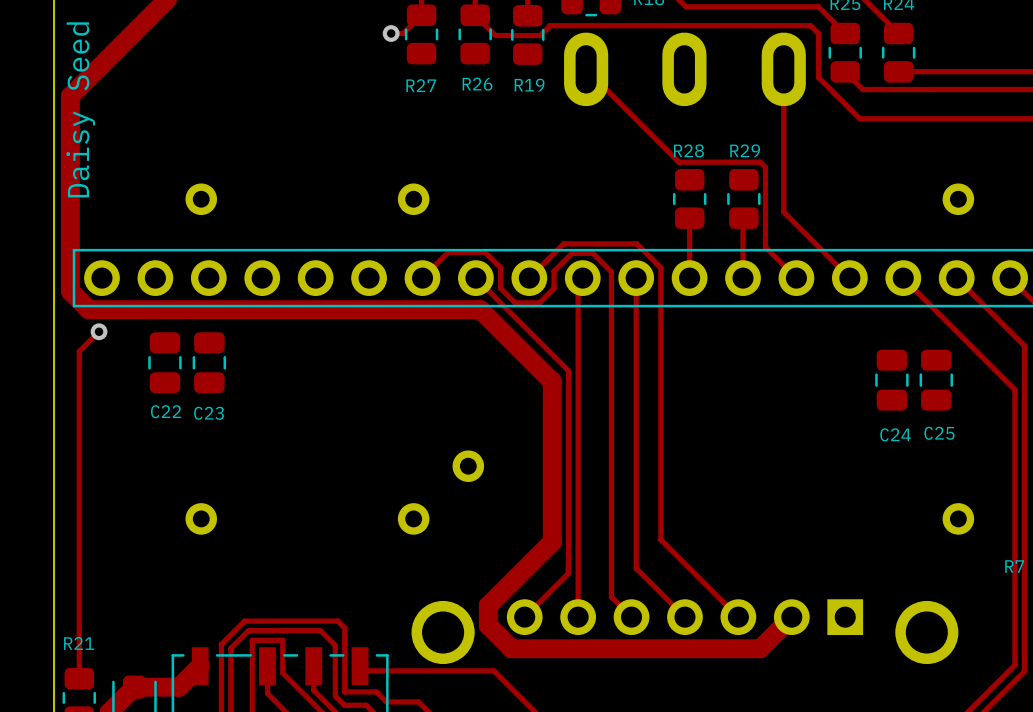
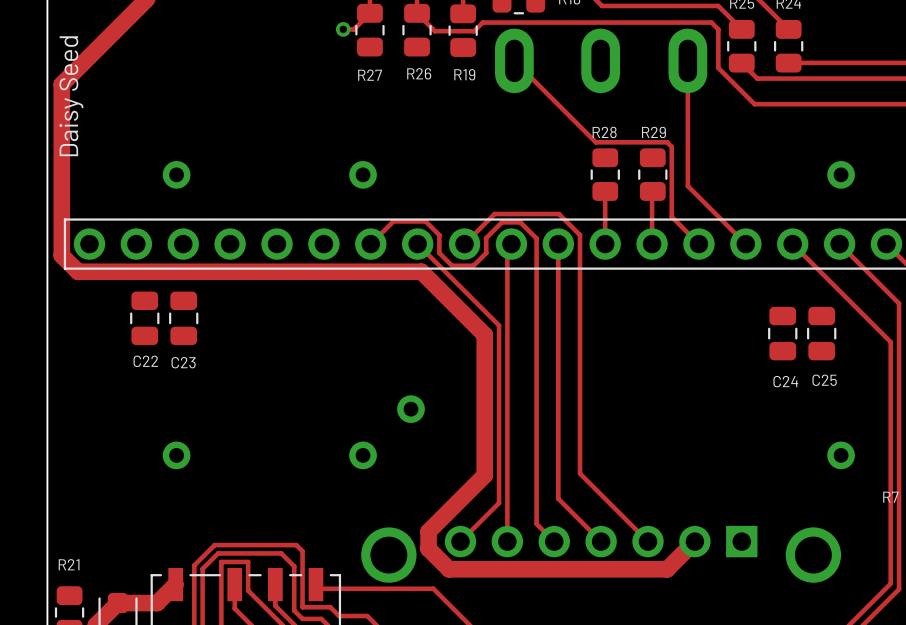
track: (99, 331) (79, 351) (79, 678) -> none
via: (99, 331) -> none

